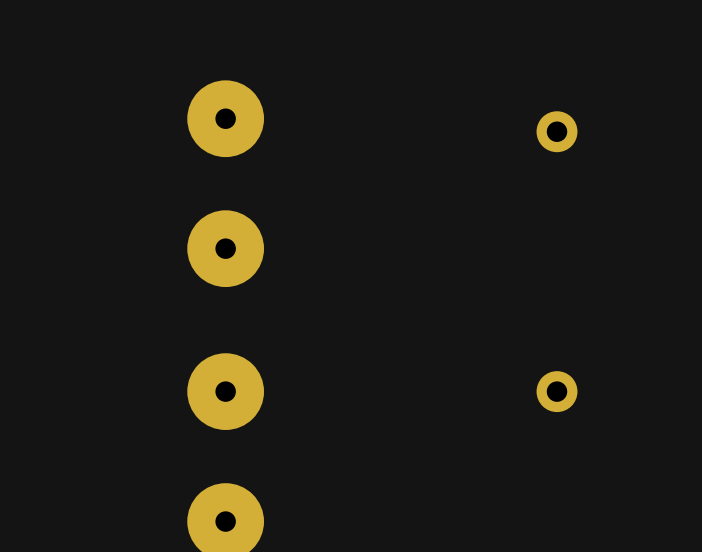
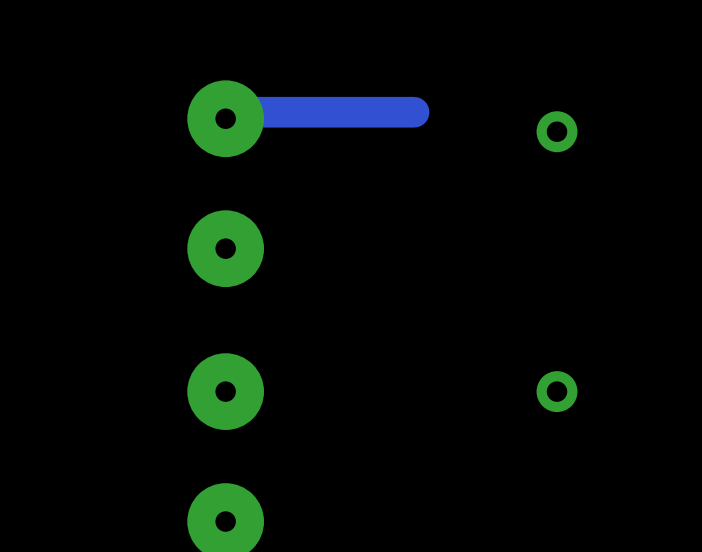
track: none -> (414, 112) (219, 112)

